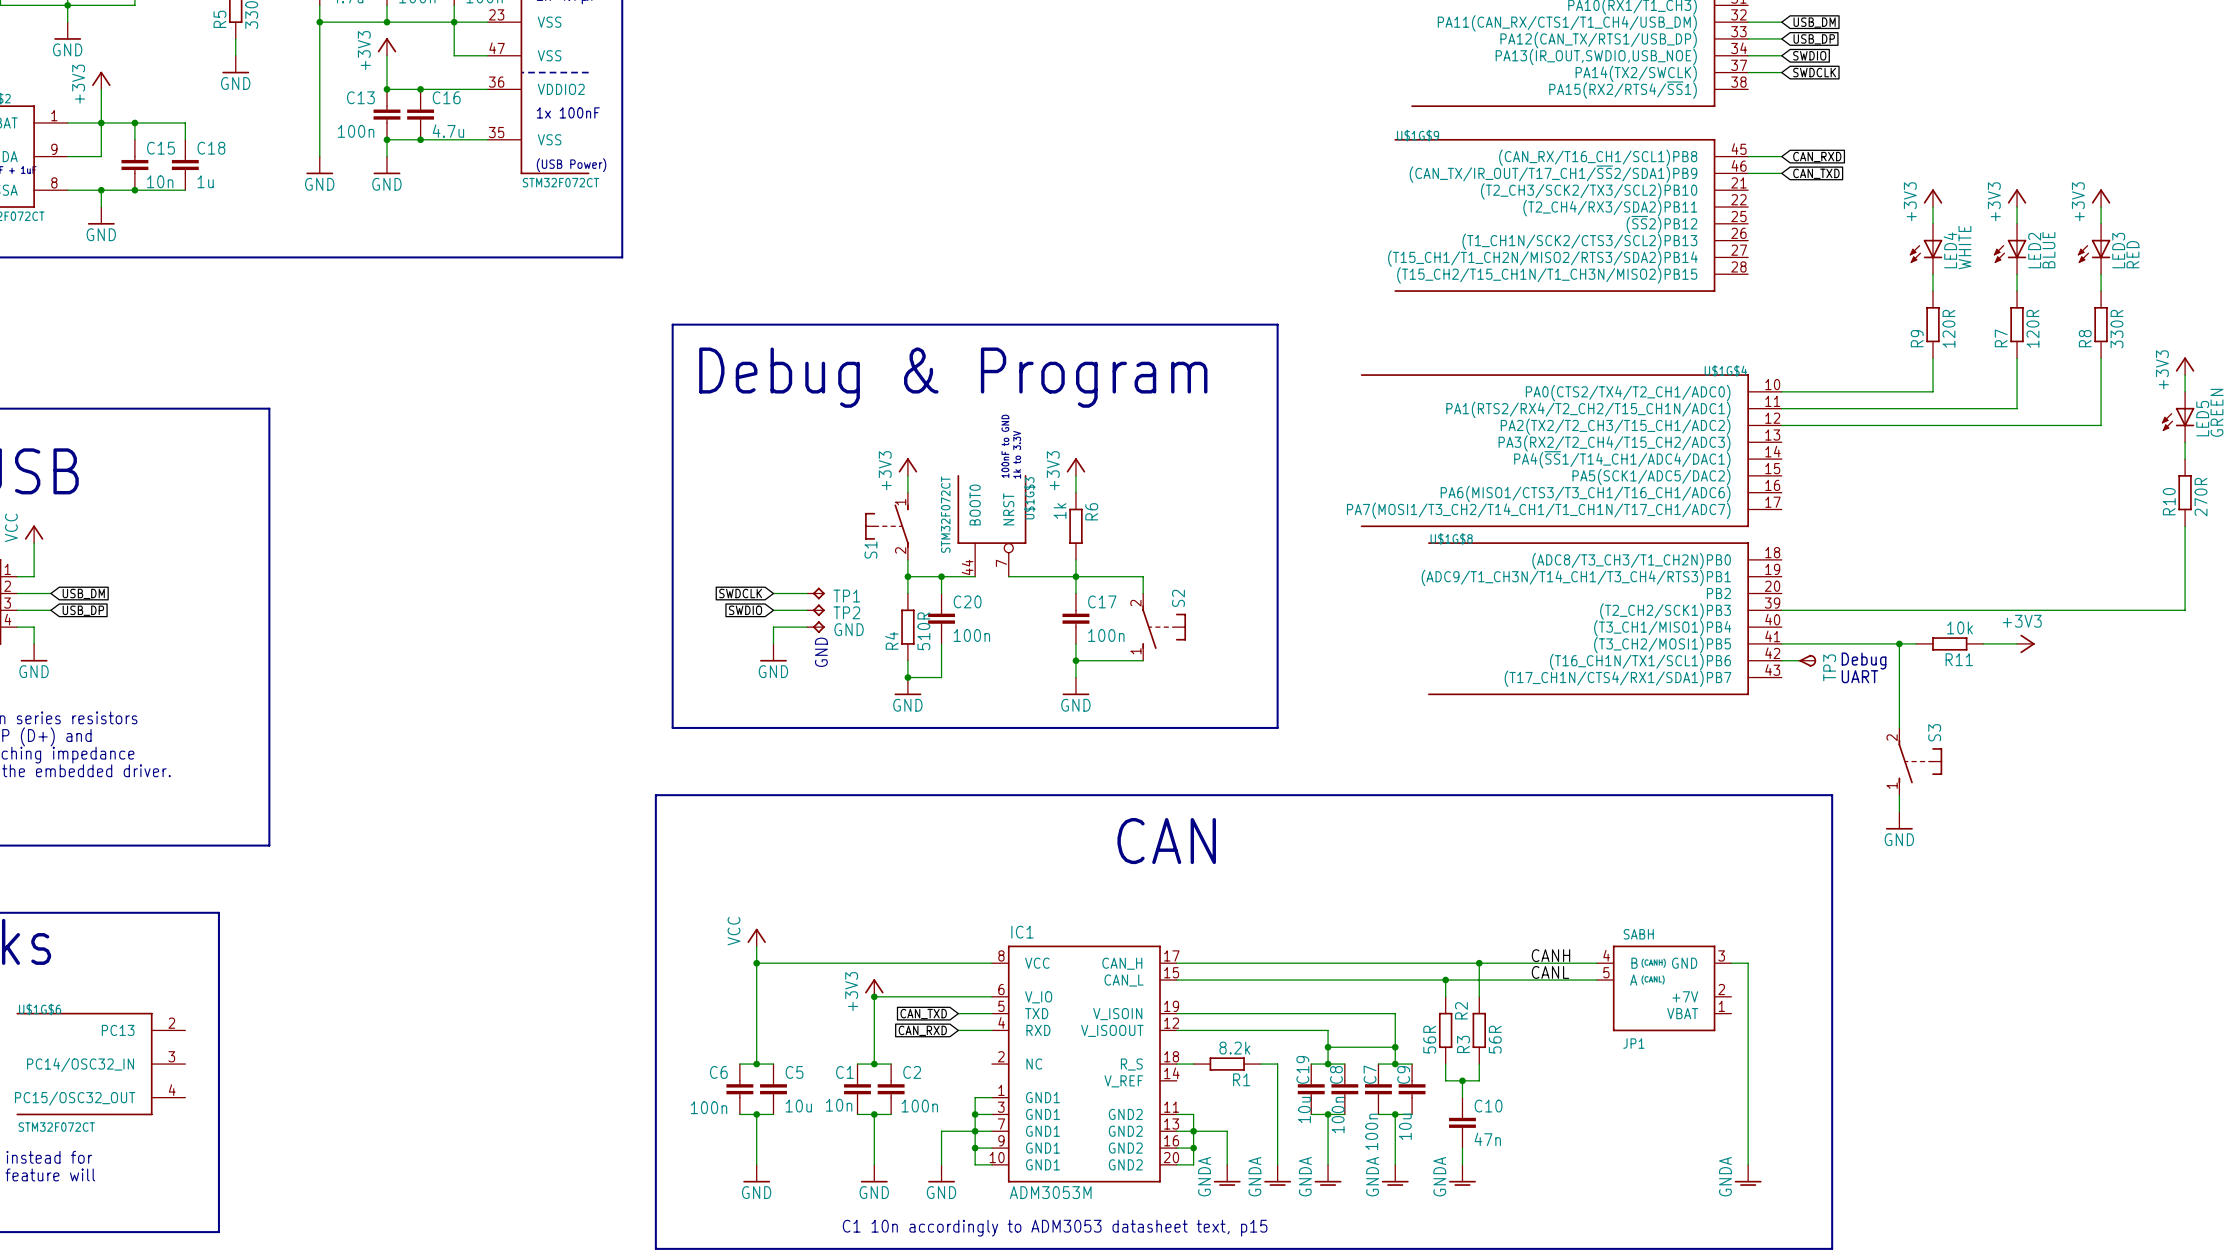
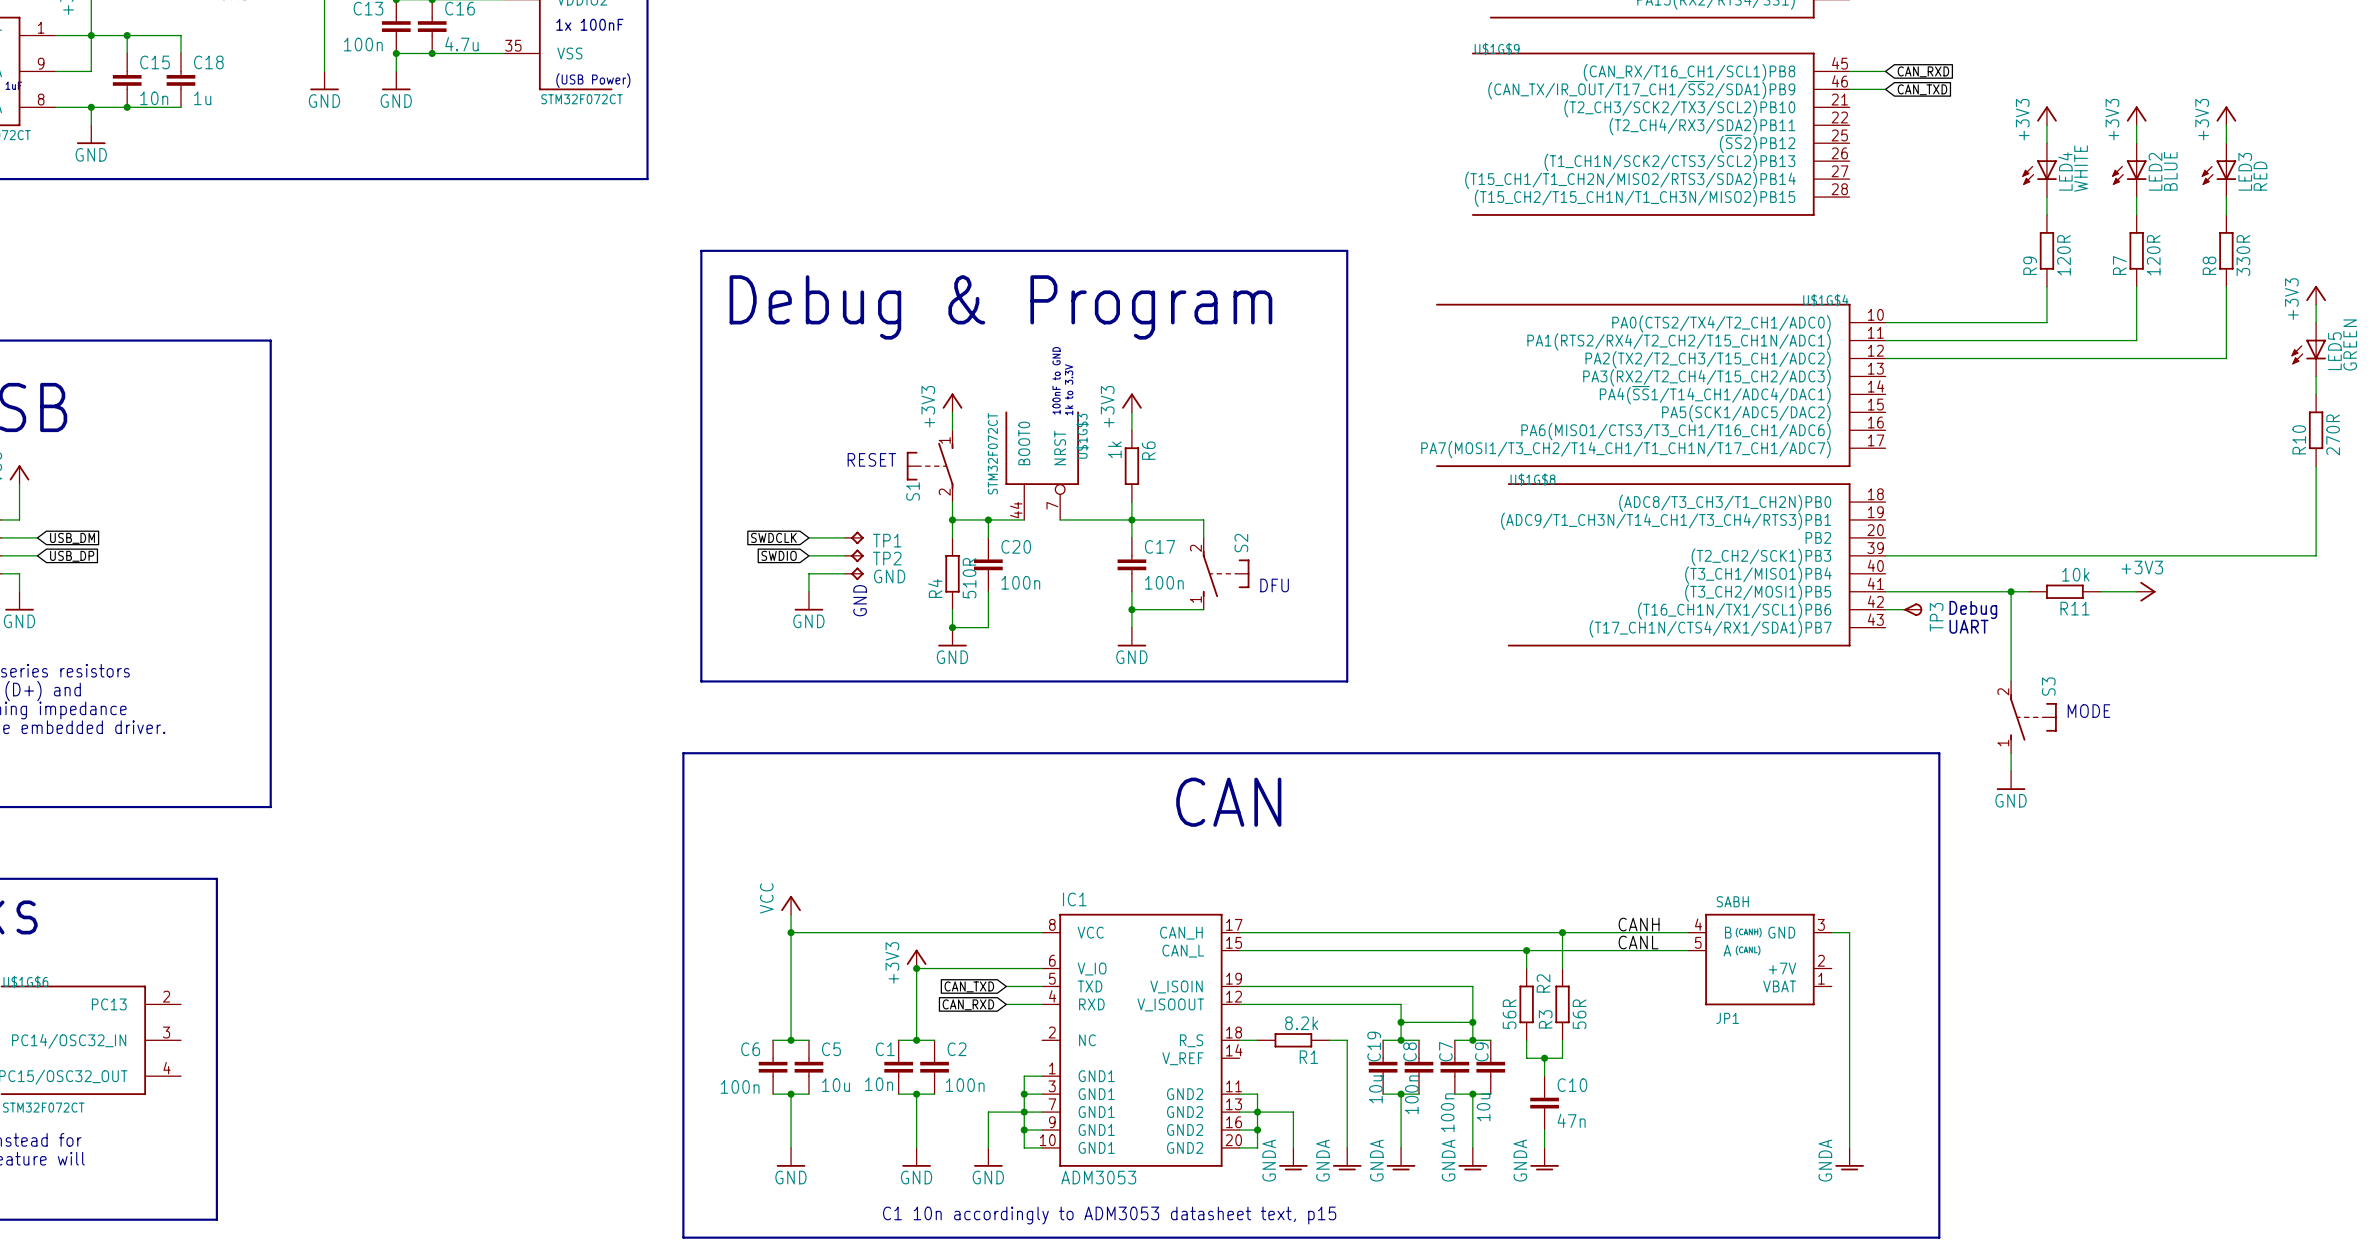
text: none -> RESET (871, 459)
text: none -> DFU (1274, 585)
text: none -> MODE (2088, 711)
IC1 value: ADM3053M (1050, 1192) -> ADM3053 (1098, 1177)

